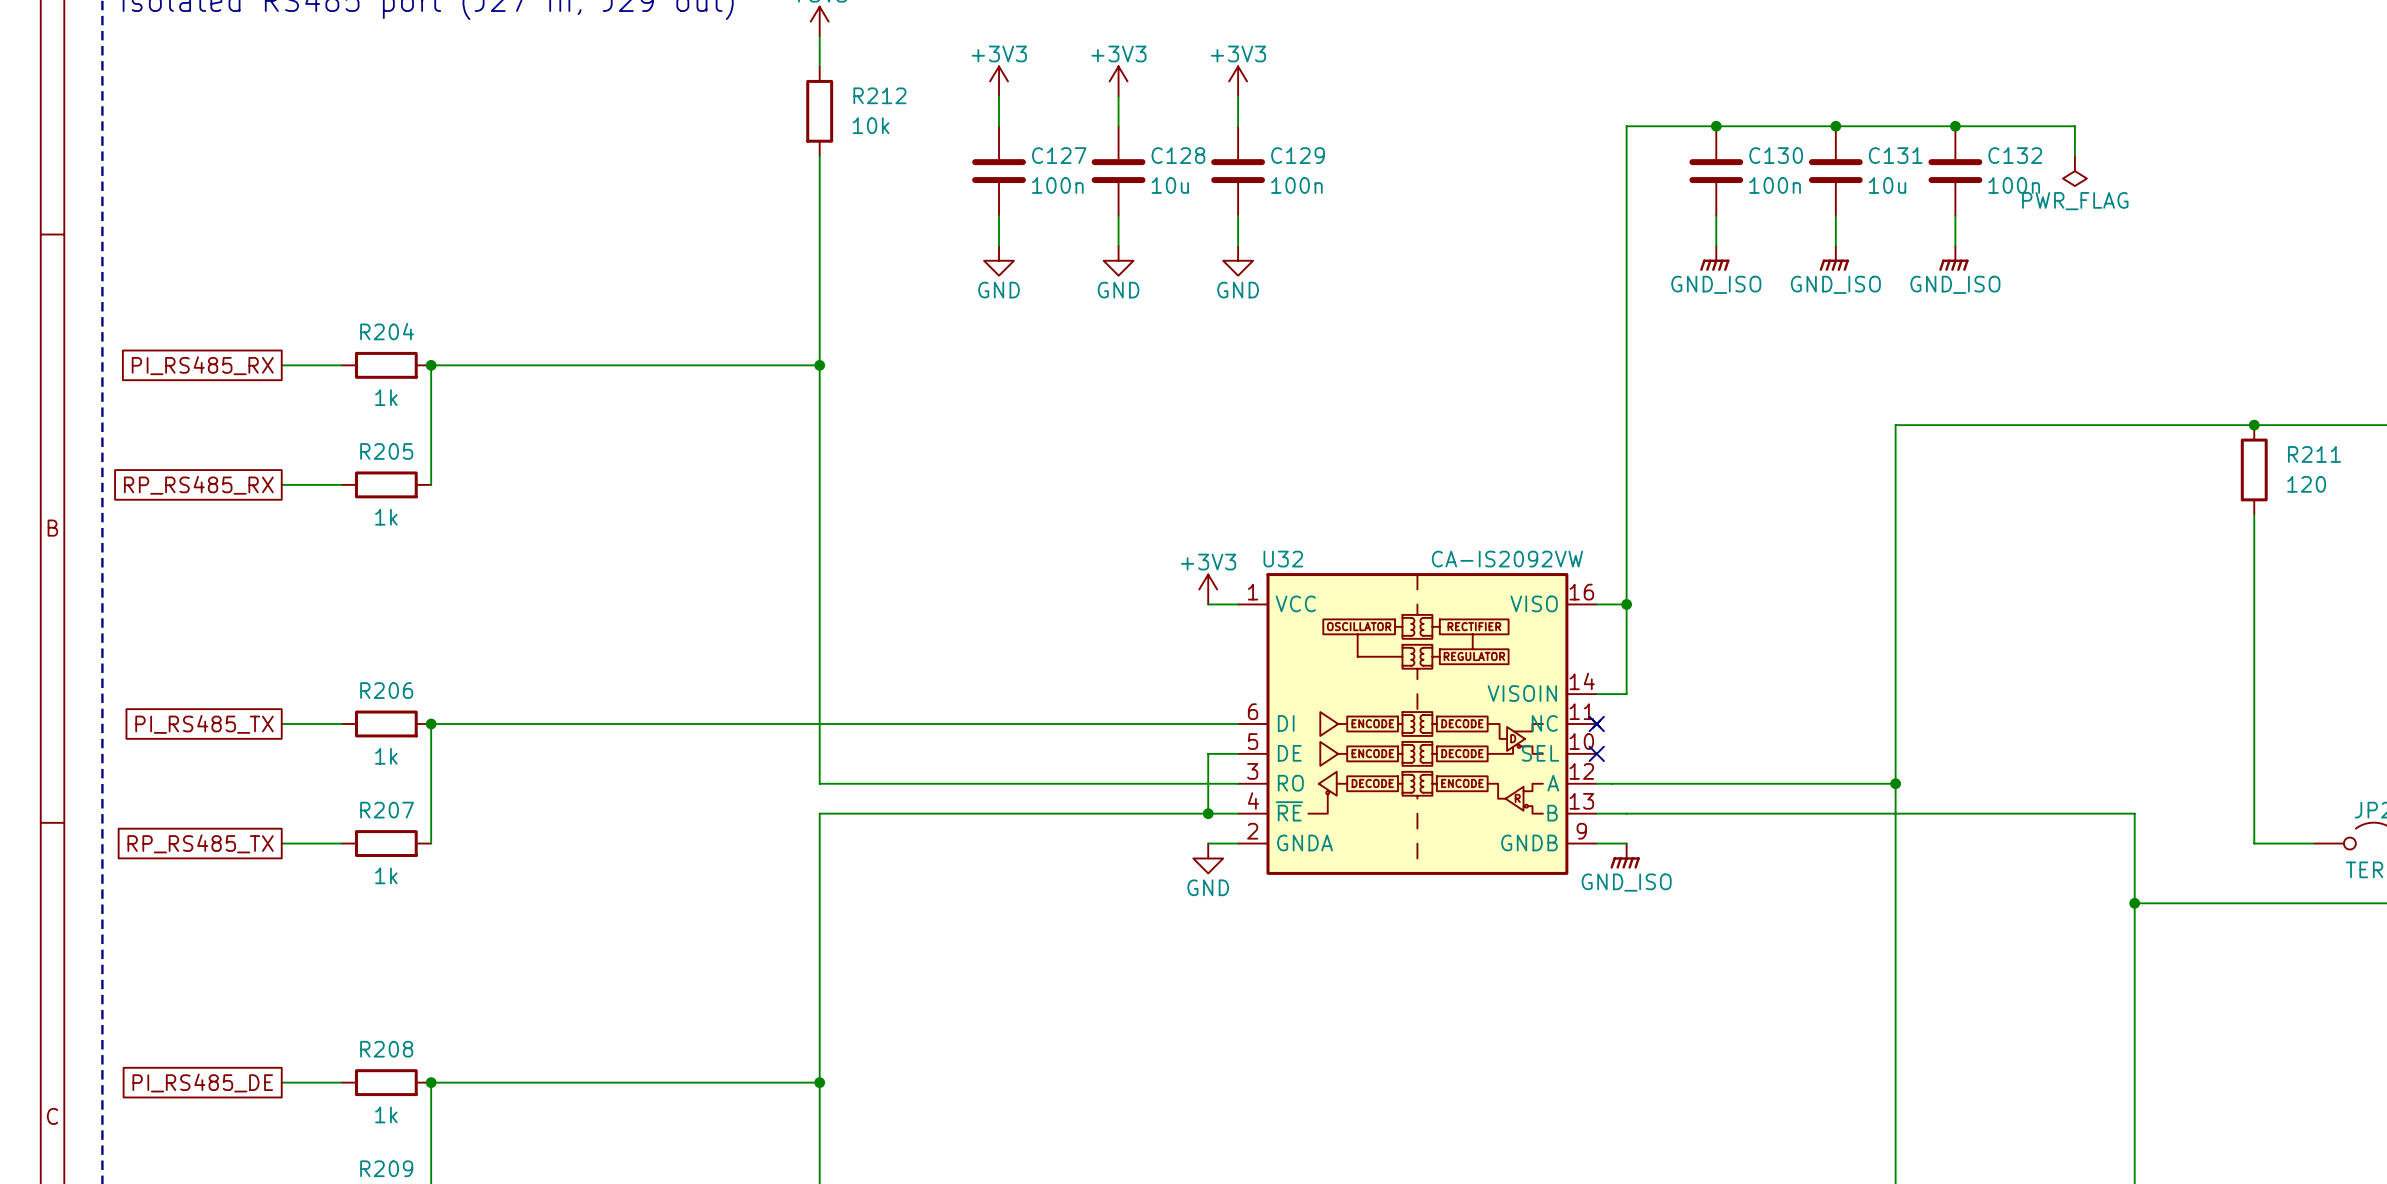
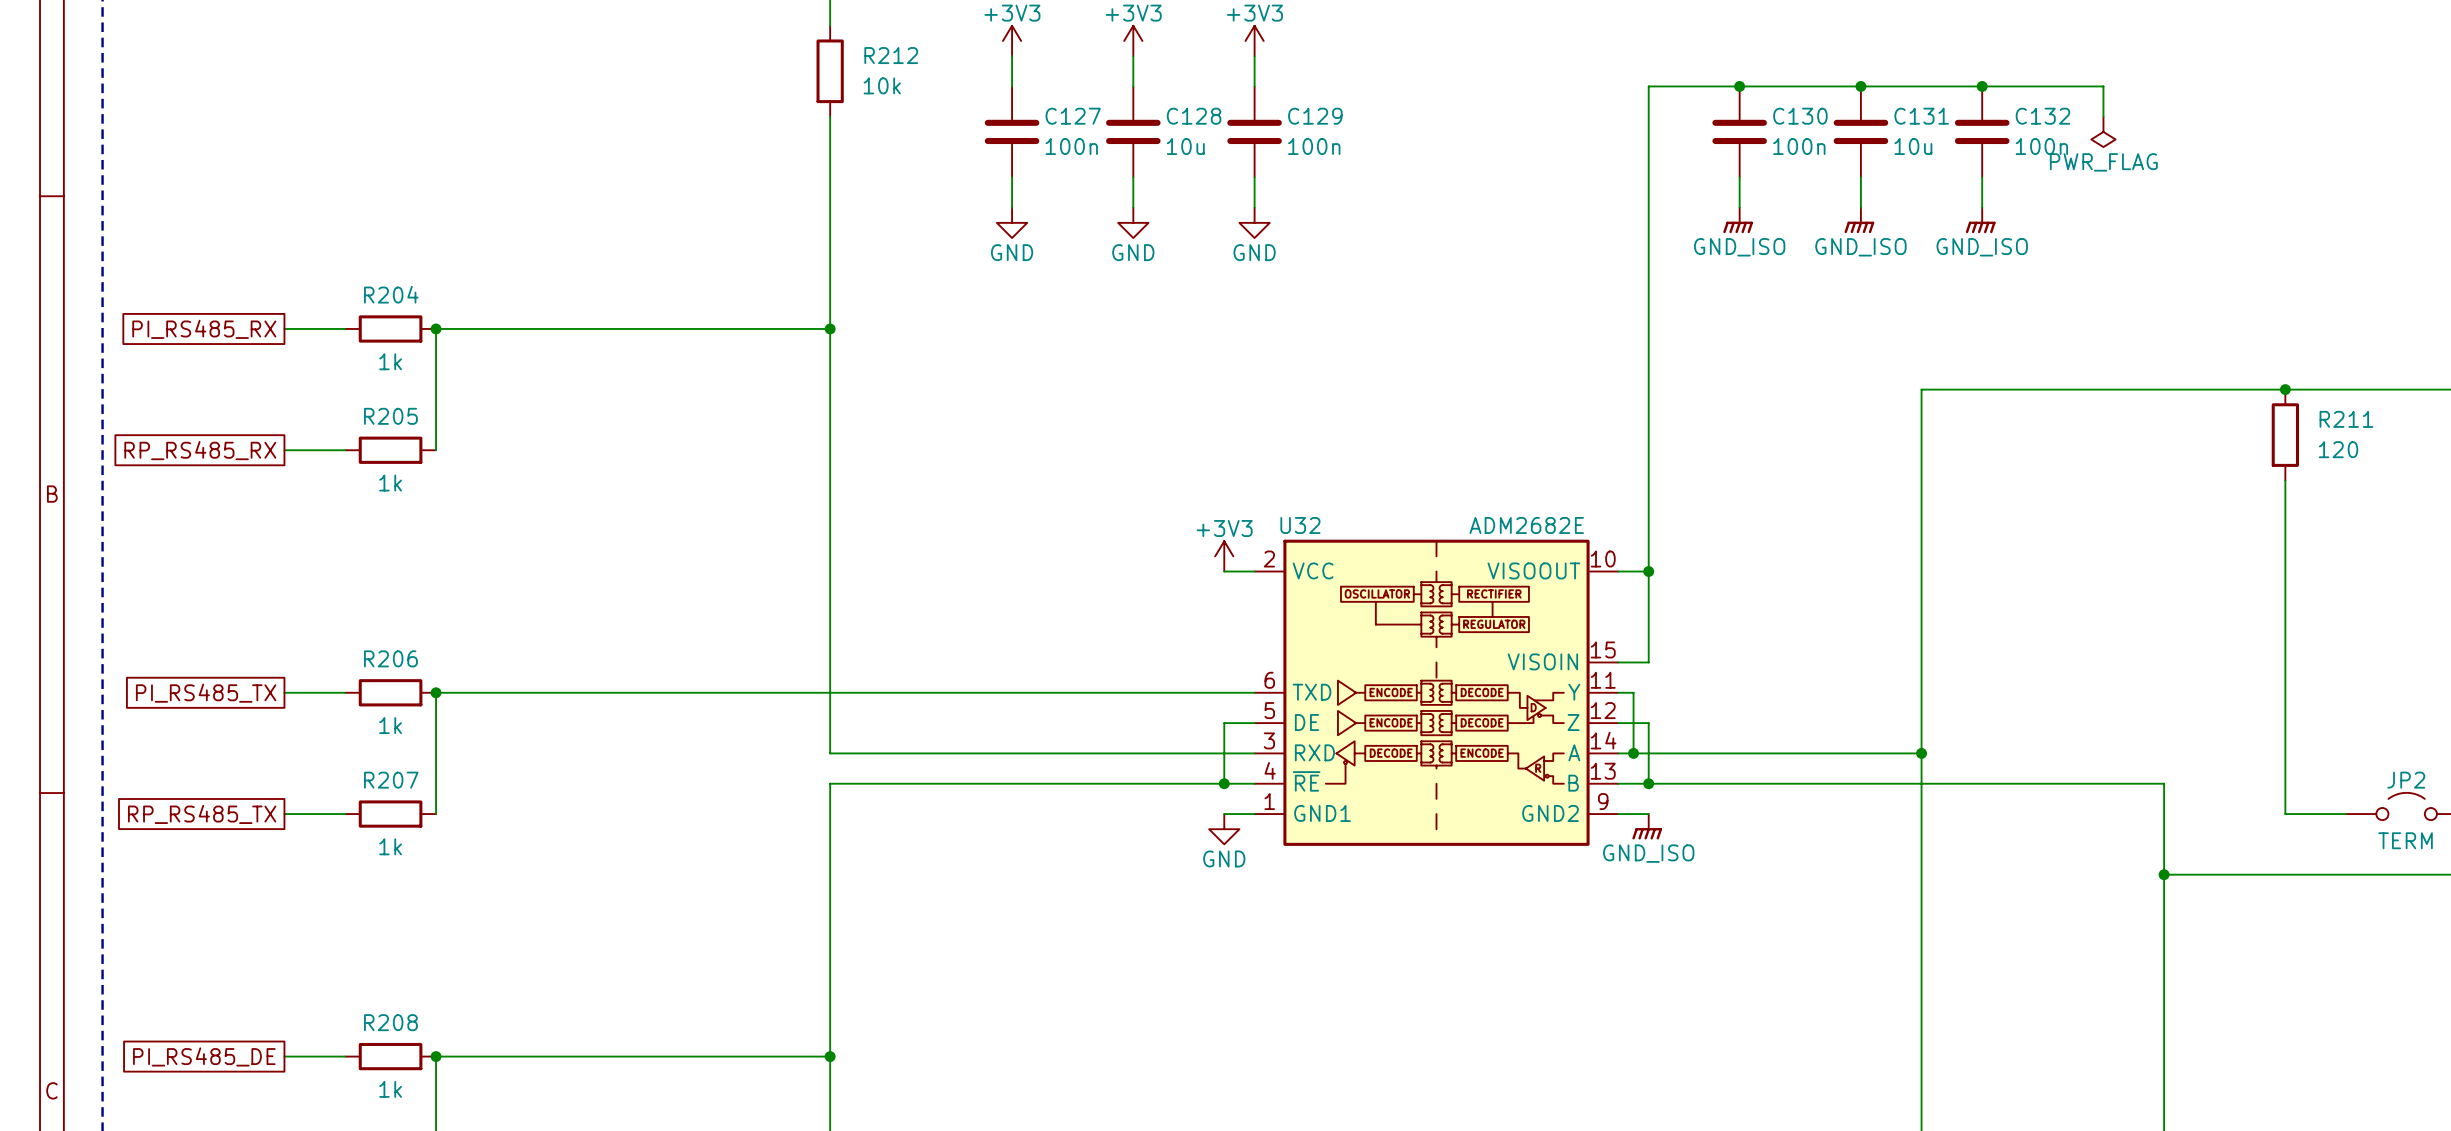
U32 value: CA-IS2092VW (1507, 559) -> ADM2682E (1526, 525)
U32 symbol: [1238, 573, 1601, 875] -> [1254, 539, 1619, 846]
wire: none -> (1618, 692) (1633, 692) (1633, 753)
no-connect mark: (1596, 723) -> none
wire: none -> (1618, 723) (1648, 723) (1648, 783)
no-connect mark: (1596, 753) -> none
junction: none -> (1633, 753)
junction: none -> (1648, 783)

